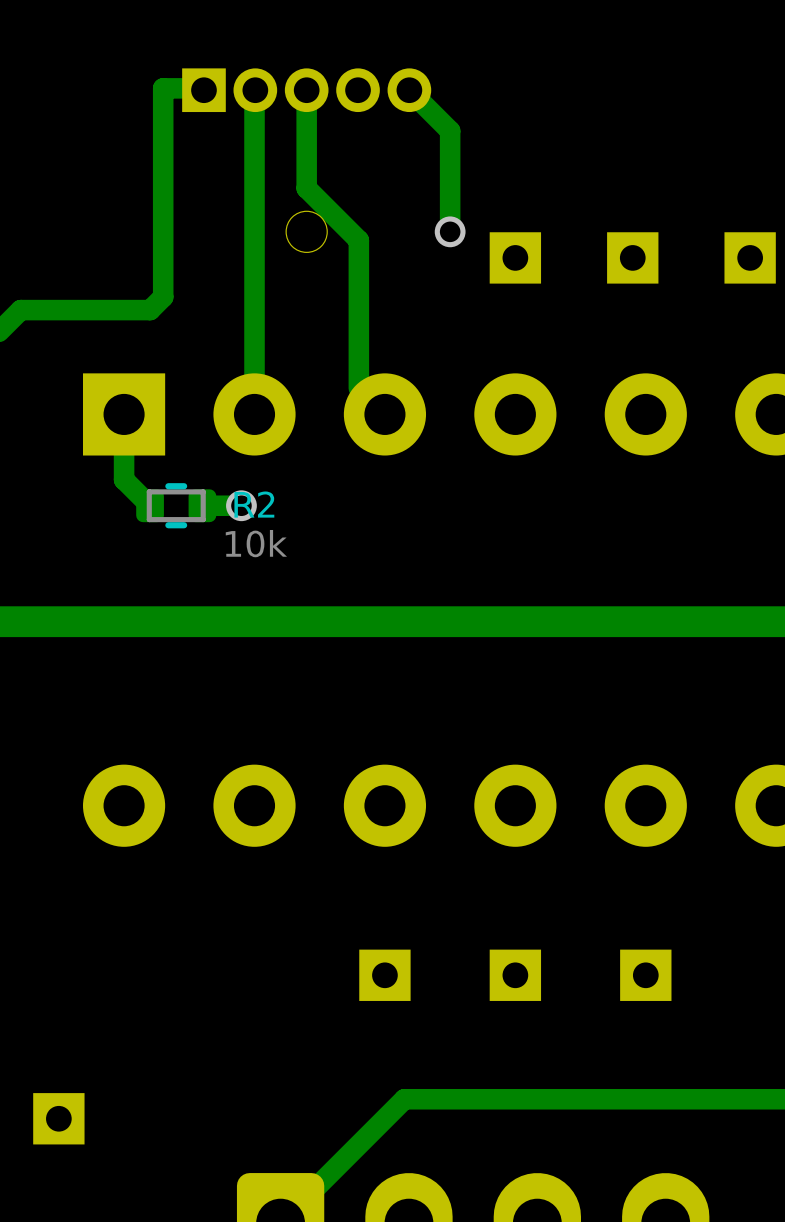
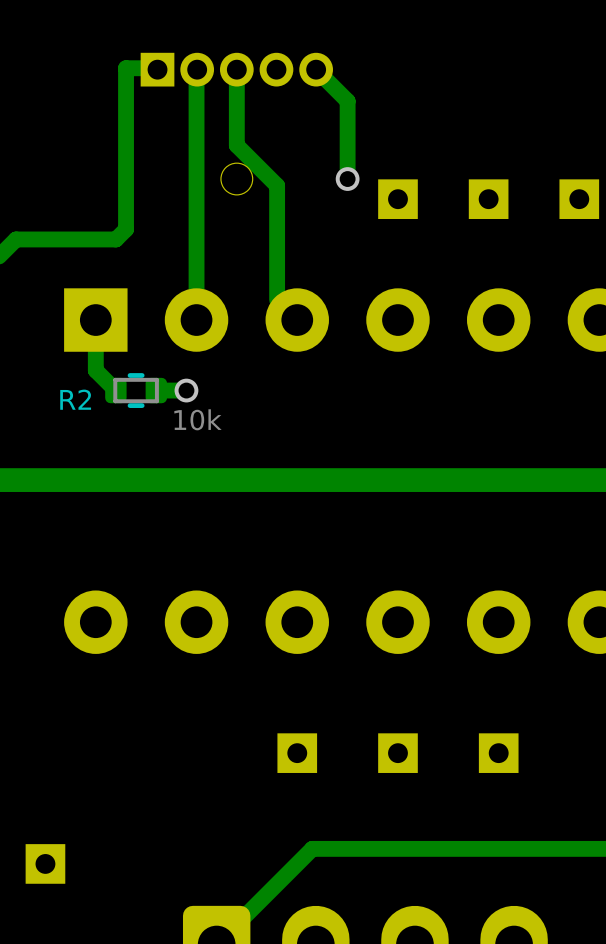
R2 name position: R2 (254, 504) -> R2 (75, 399)

